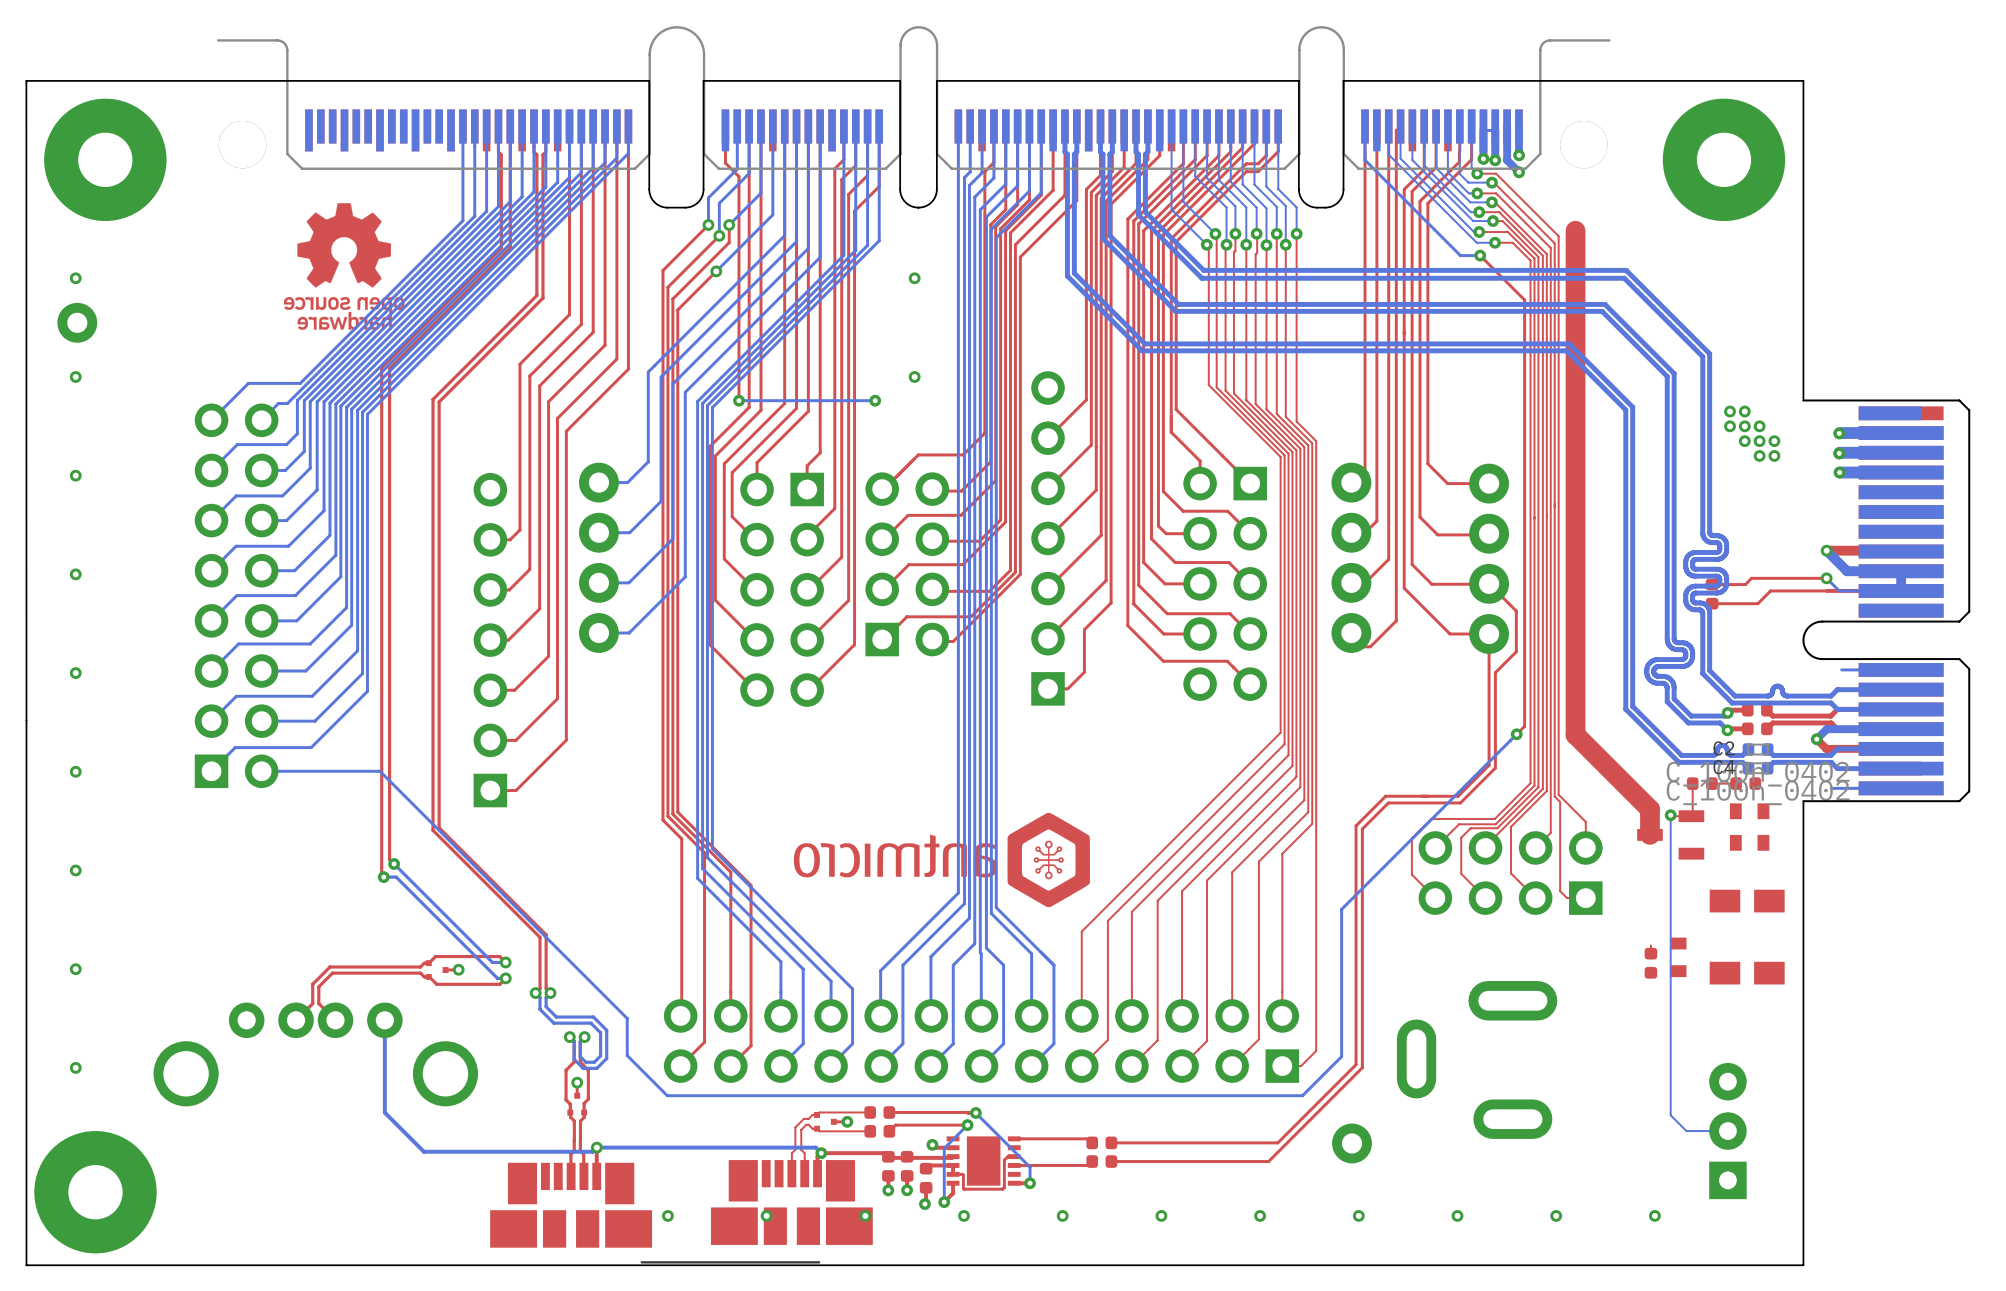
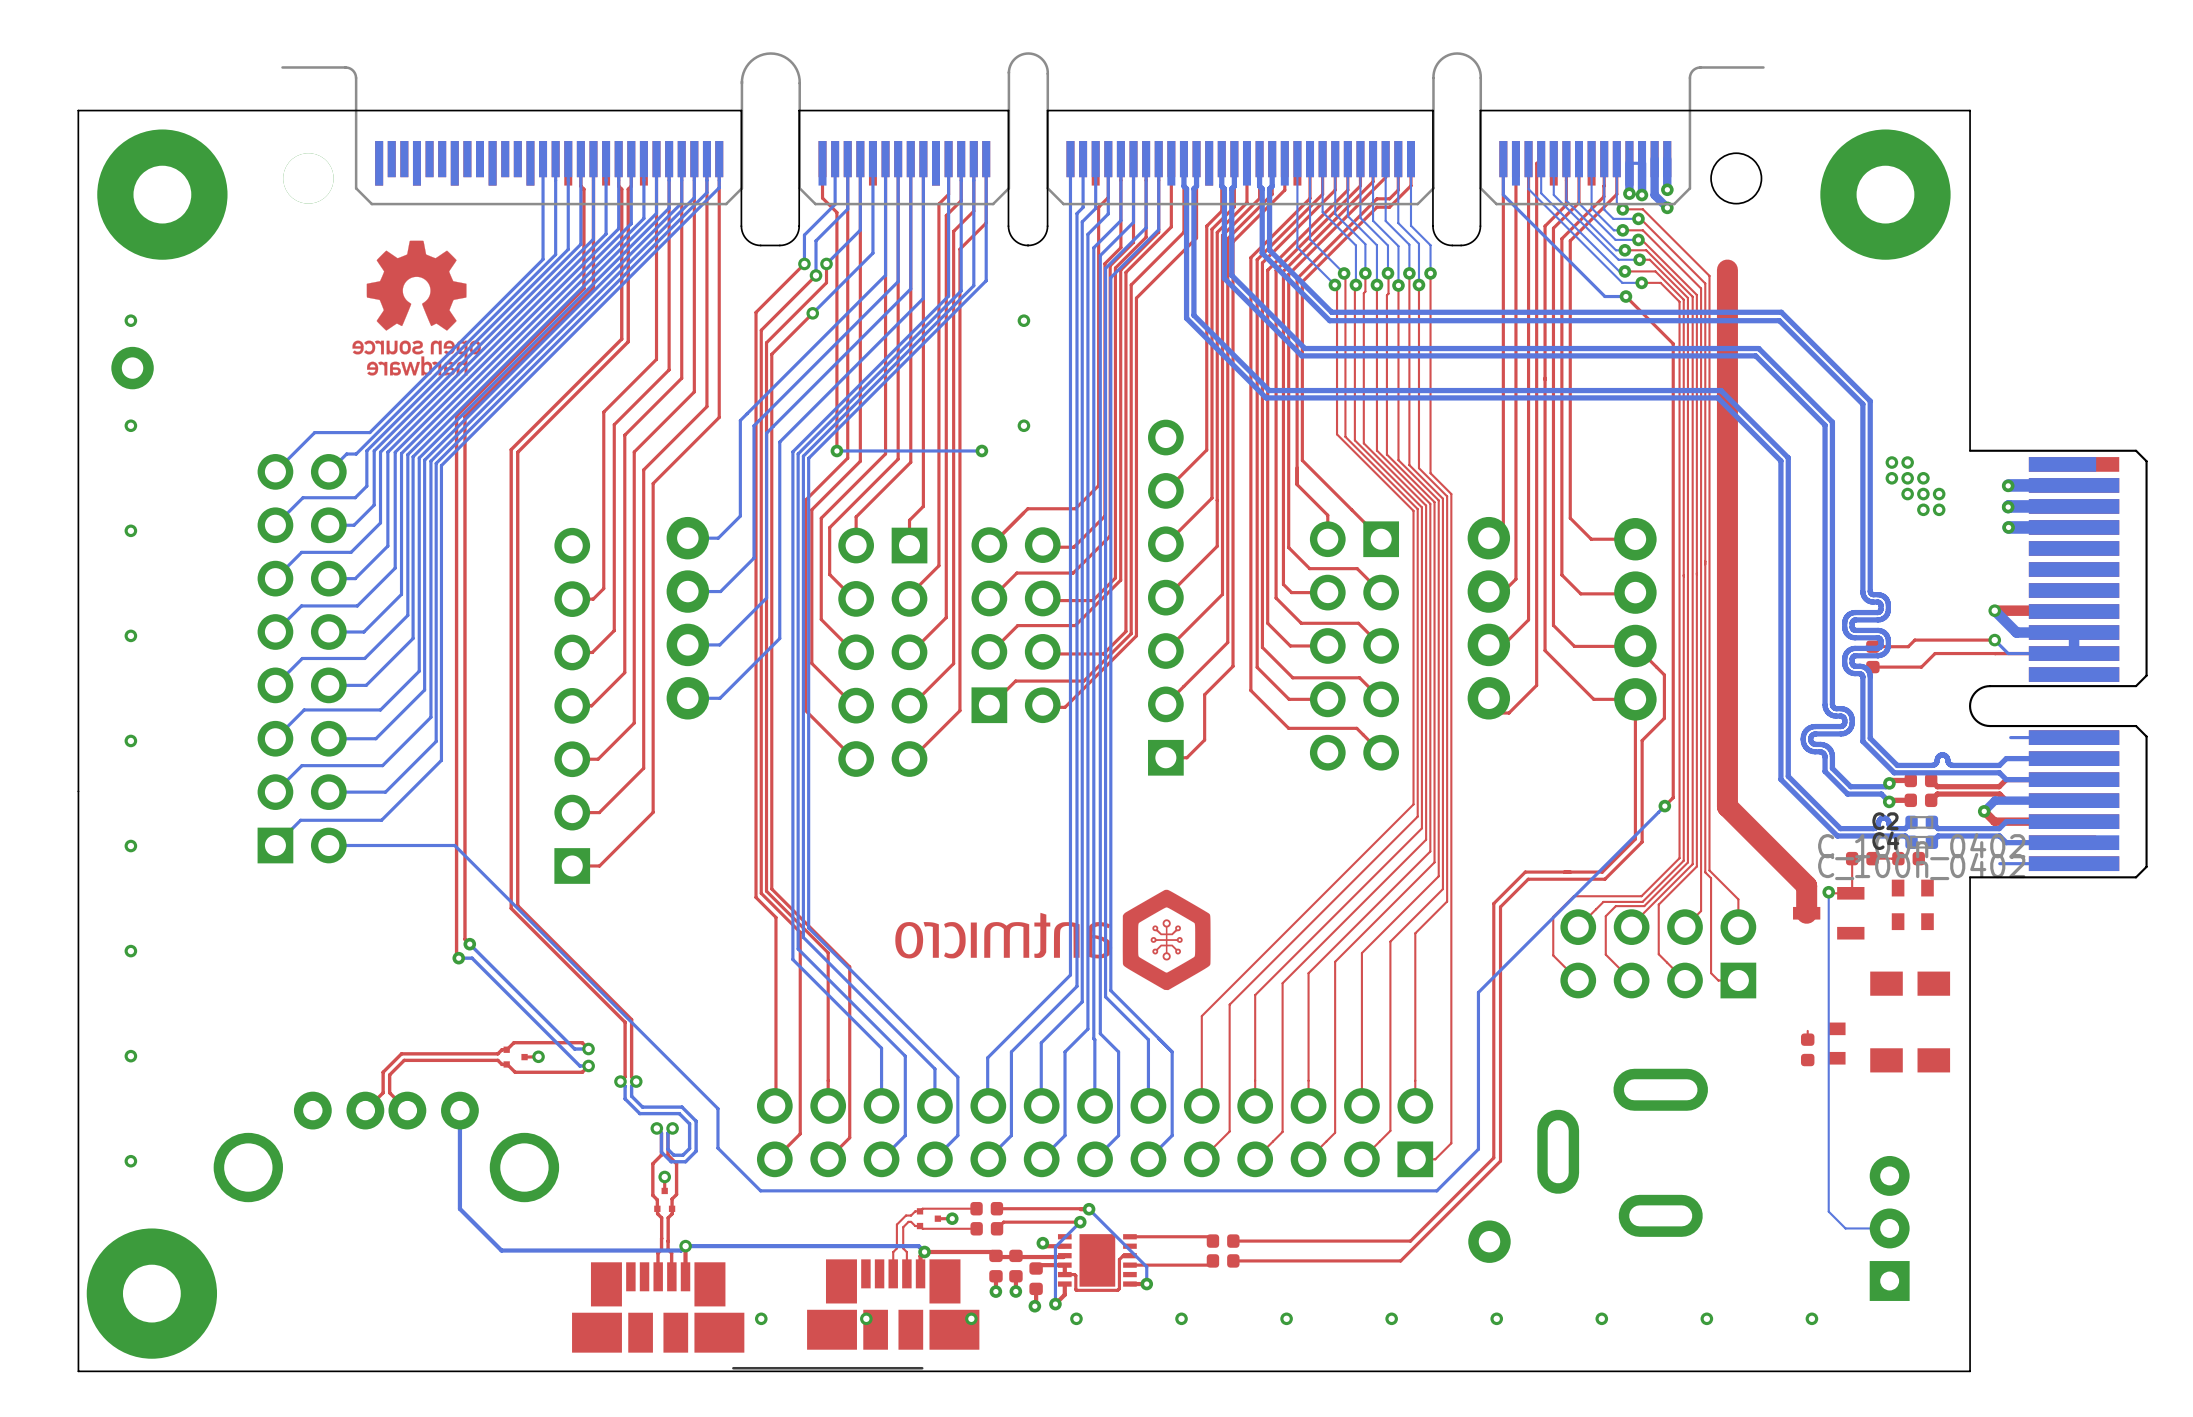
part footprint: [216, 26, 1611, 170] -> [281, 52, 1765, 206]

